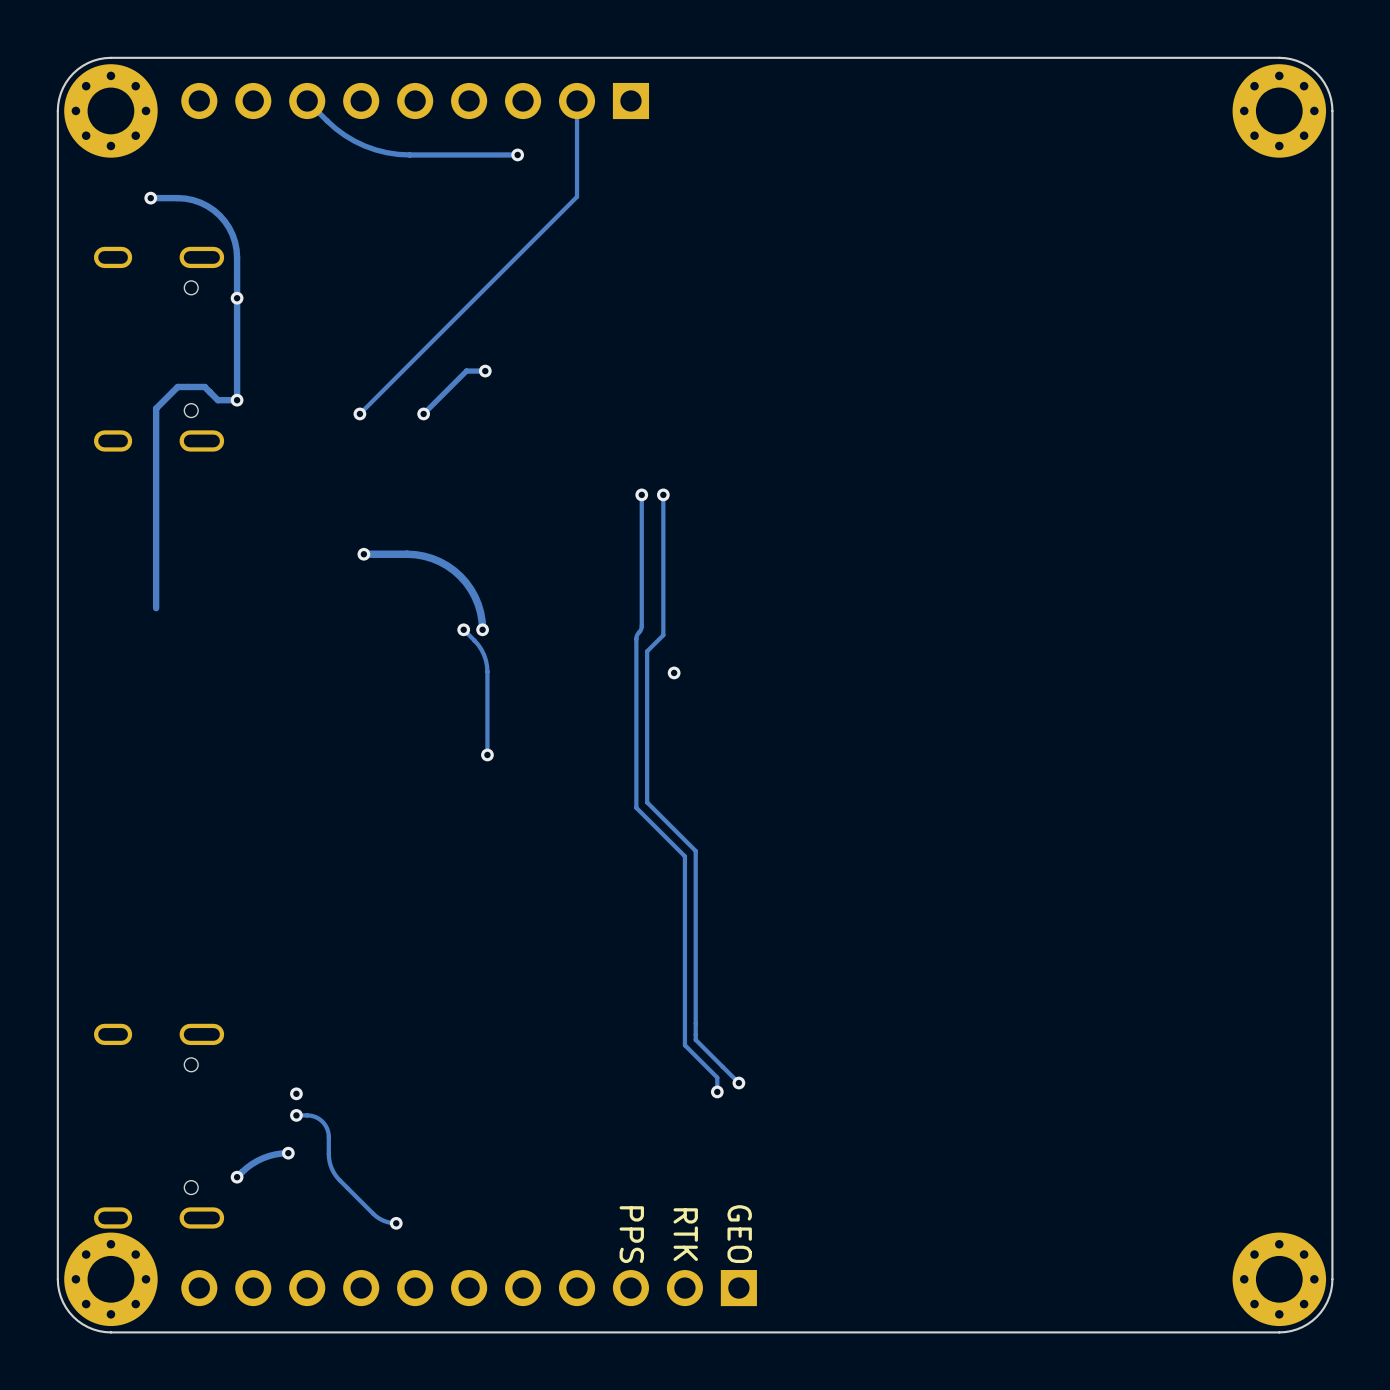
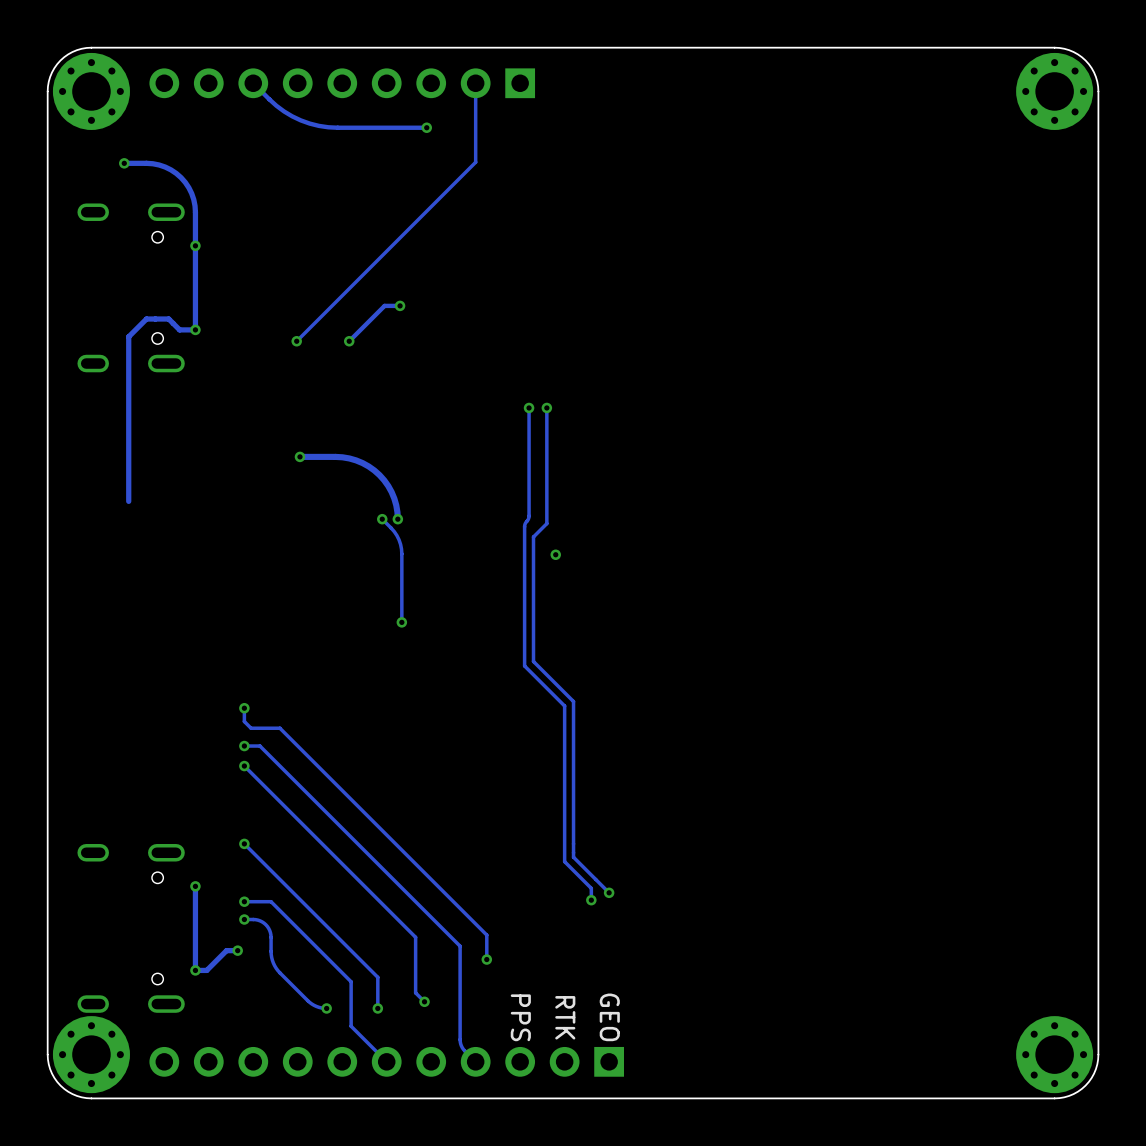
track: none -> (244, 708) (244, 721) (251, 728) (279, 728) (486, 935) (486, 959)
via: none -> (244, 708)
track: none -> (244, 746) (259, 746) (460, 946) (460, 1041) (463, 1049) (475, 1061)
via: none -> (244, 746)
track: none -> (244, 766) (415, 937) (415, 992) (424, 1001)
via: none -> (244, 766)
track: none -> (244, 843) (377, 977) (377, 1008)
via: none -> (244, 843)
via: none -> (195, 886)
track: none -> (244, 901) (271, 901) (351, 981) (351, 1026) (386, 1061)
track: (288, 1153) (263, 1158) (251, 1164) (237, 1177) -> (237, 950) (226, 950) (206, 970) (195, 970) (195, 886)
via: none -> (486, 959)
via: none -> (424, 1001)
via: none -> (377, 1008)

